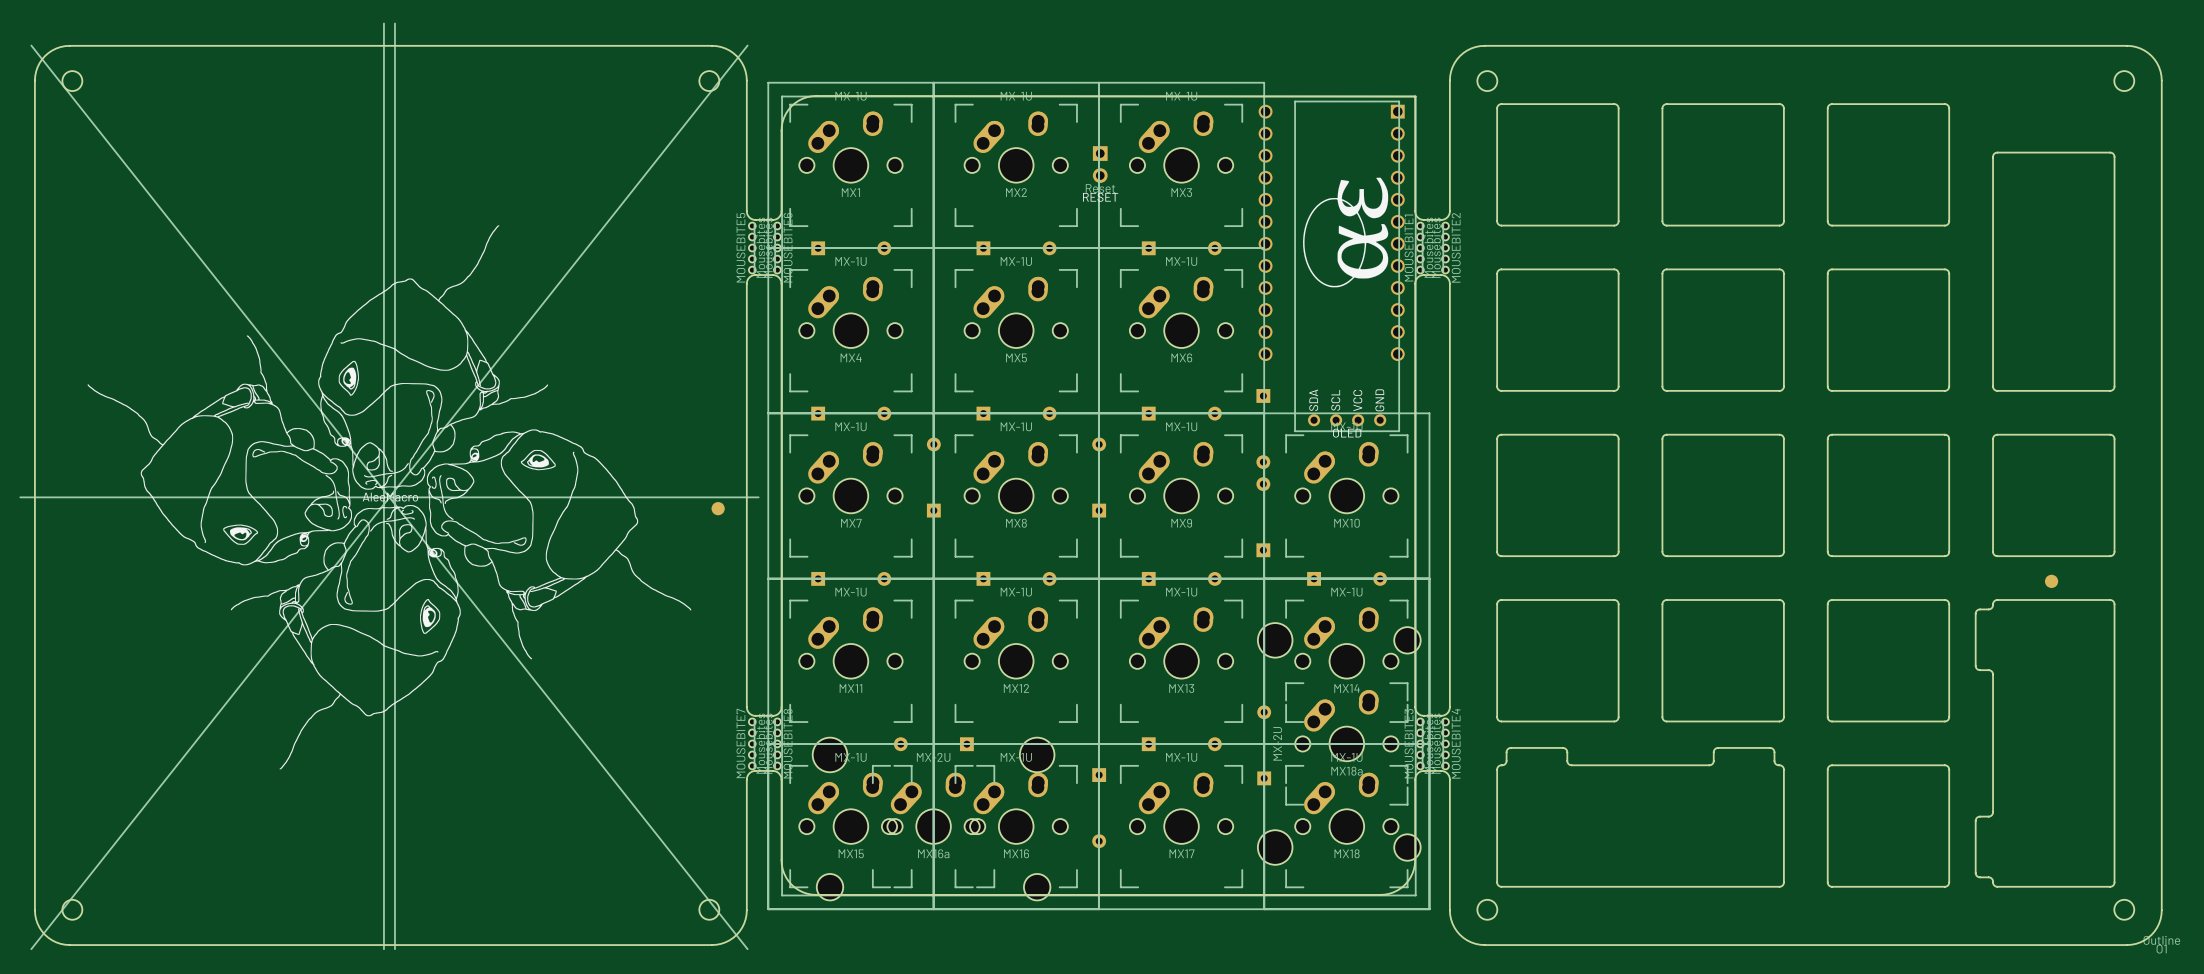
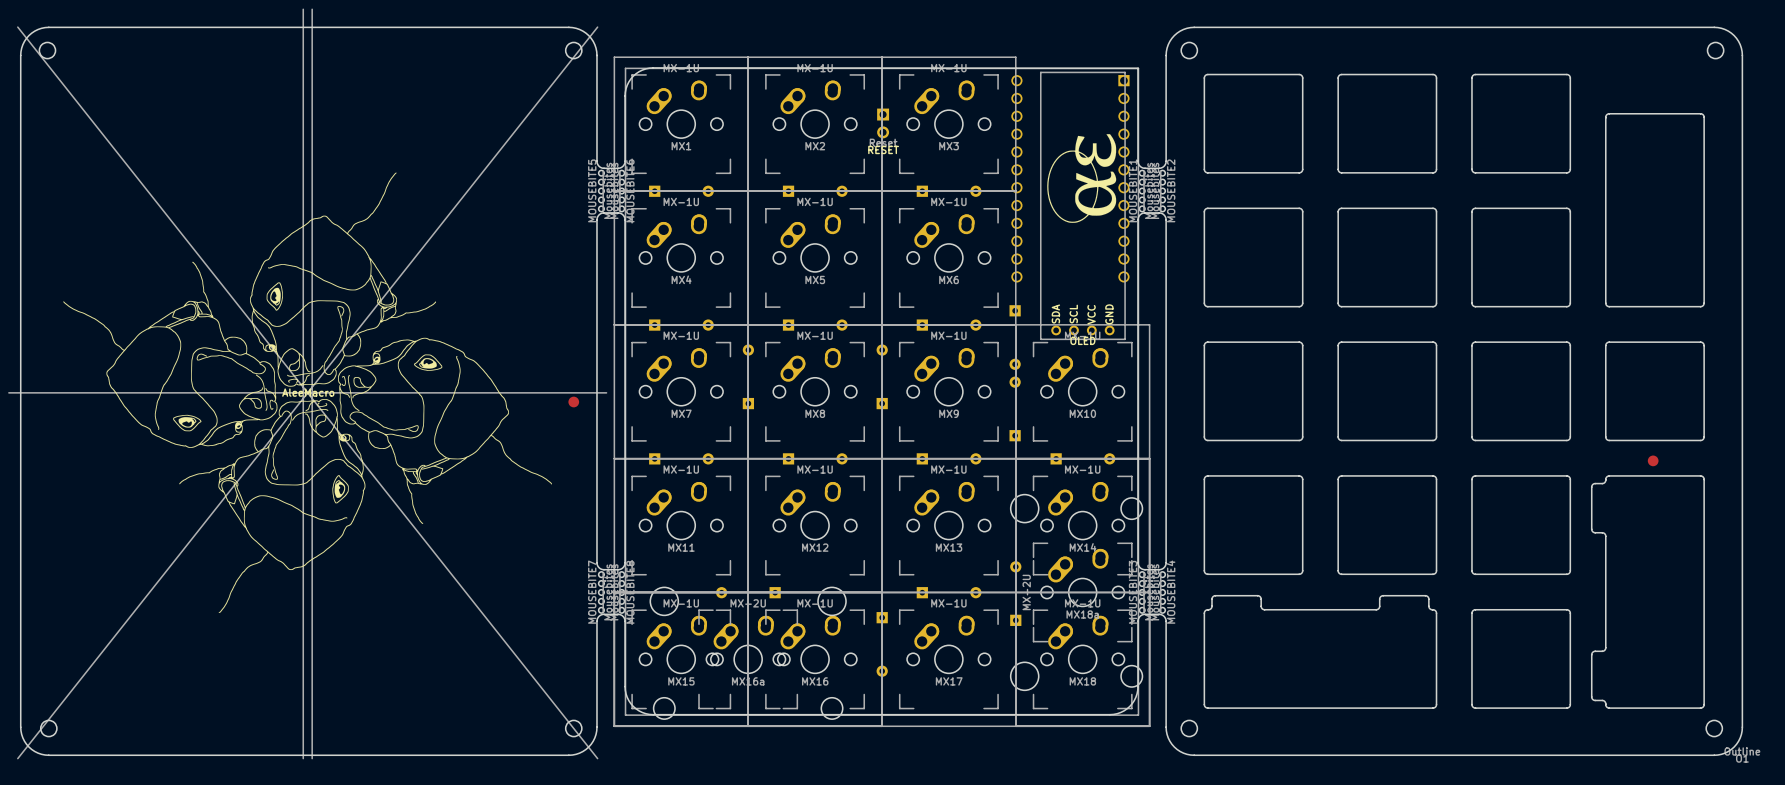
O1 footprint: [34, 44, 2163, 946] -> [20, 26, 1744, 756]

